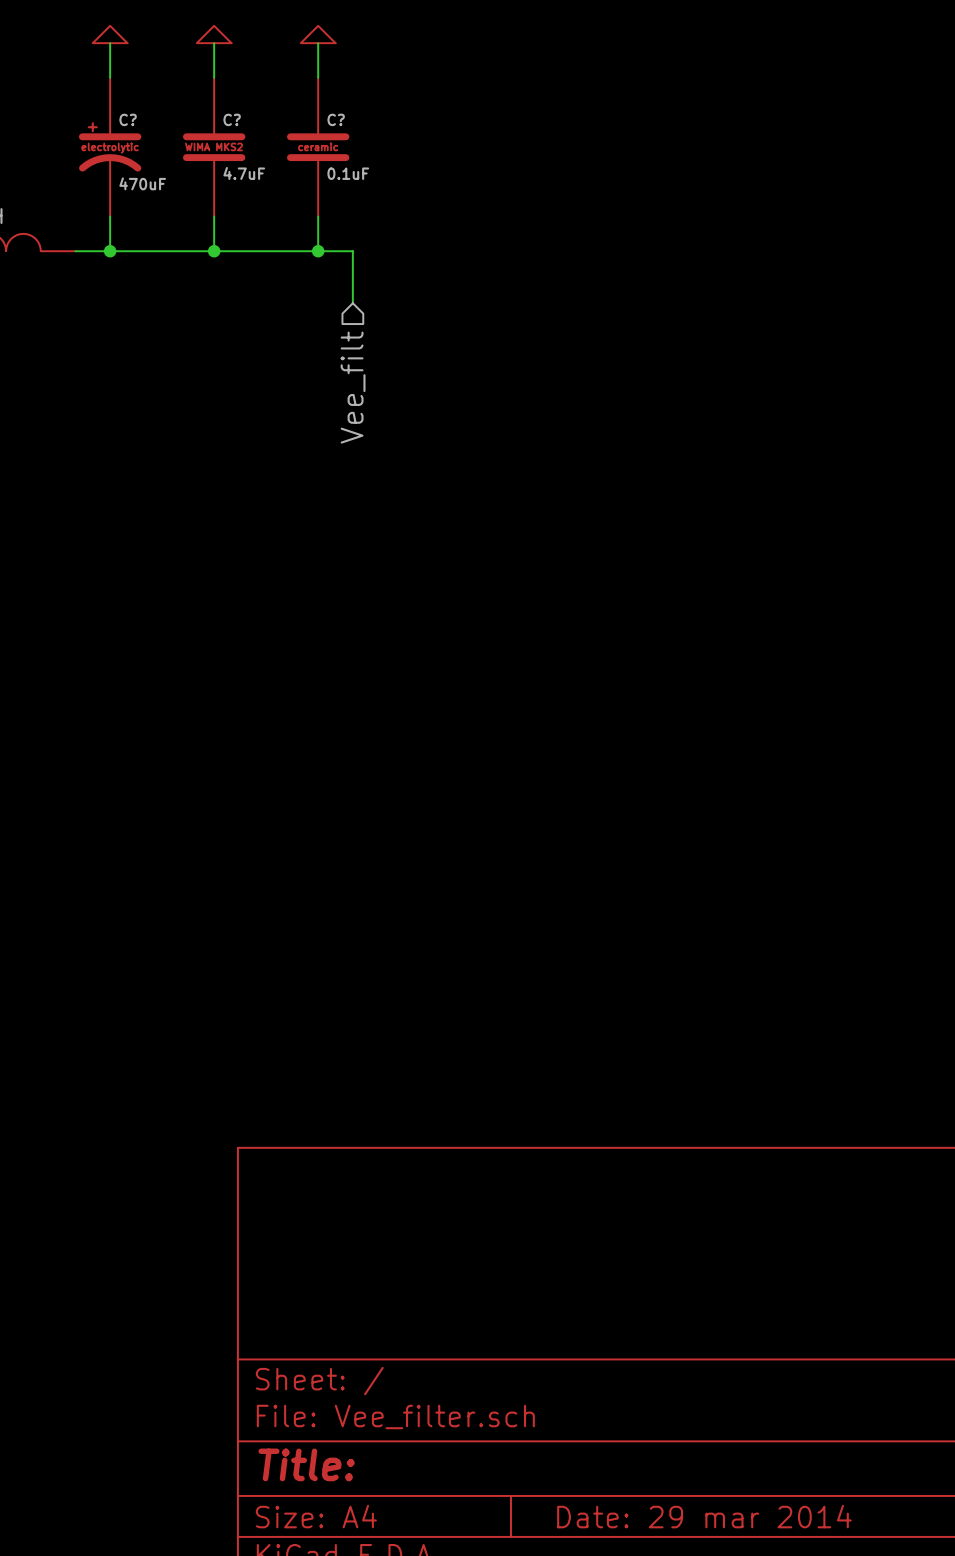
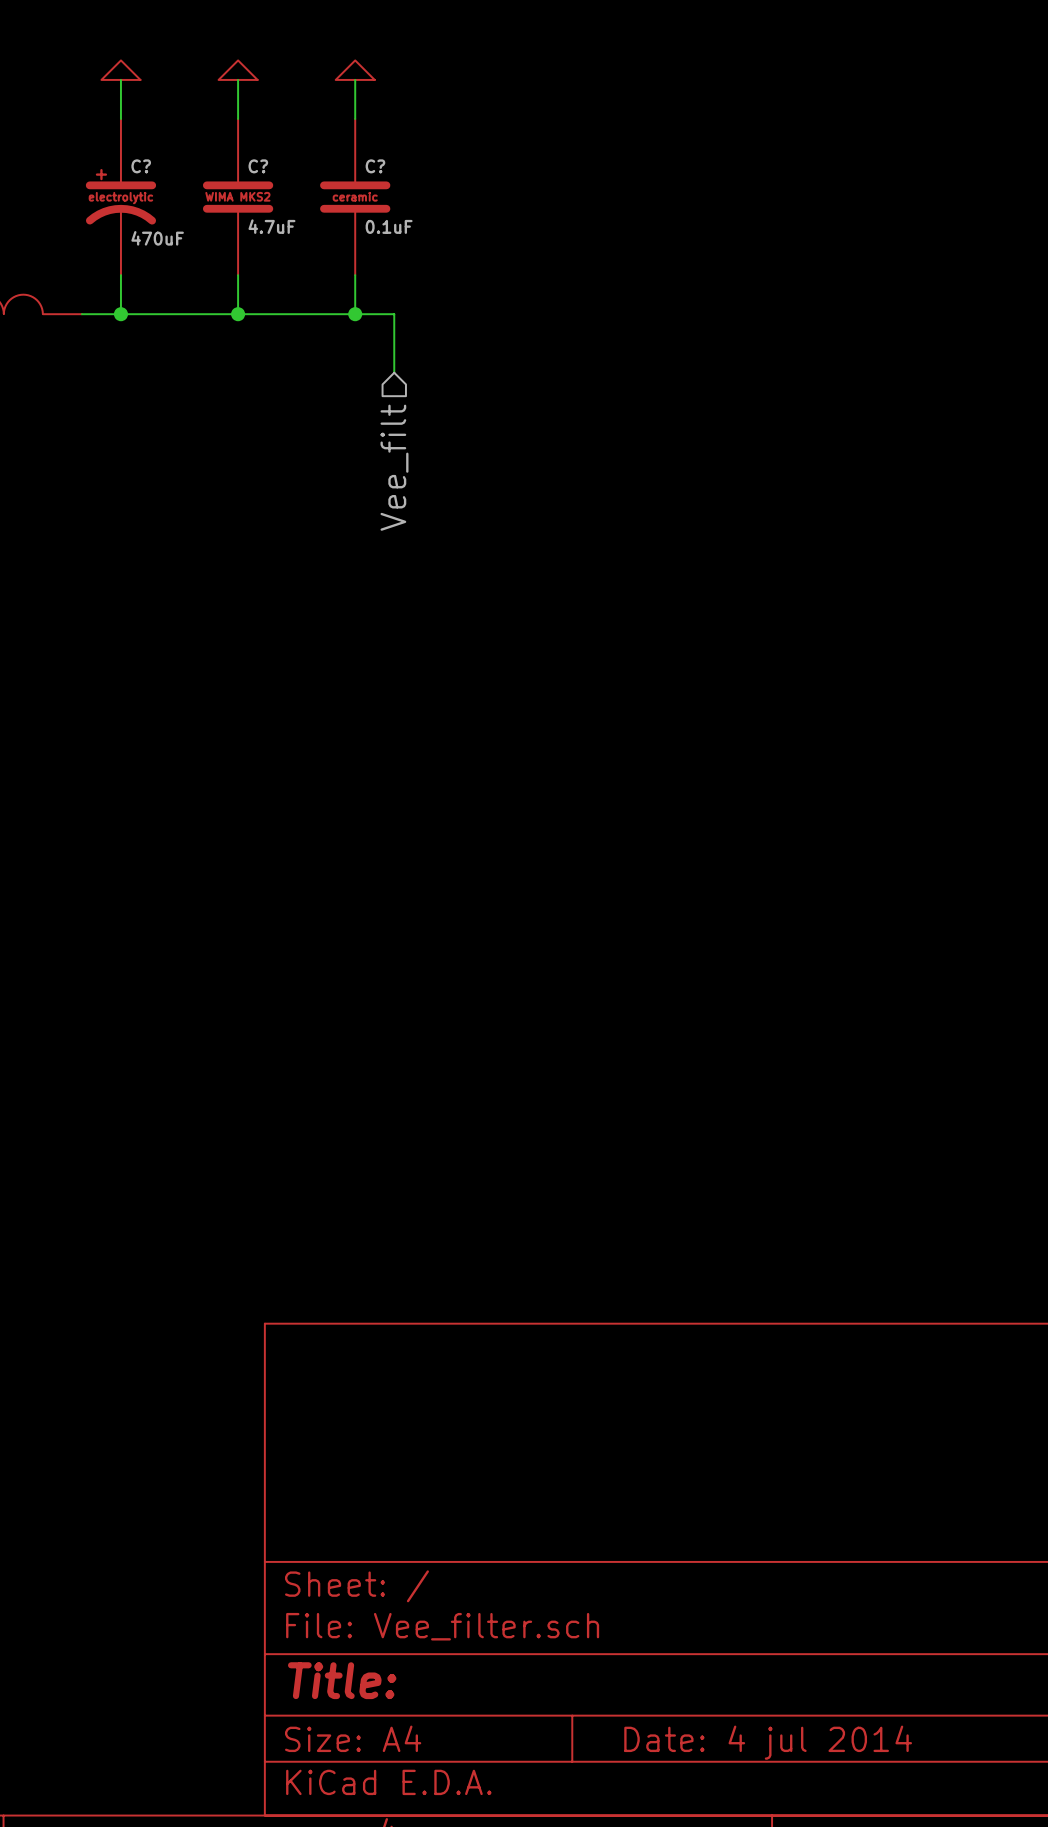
title block: Date: 29 mar 2014 (704, 1516) -> Date: 4 jul 2014 (768, 1742)

